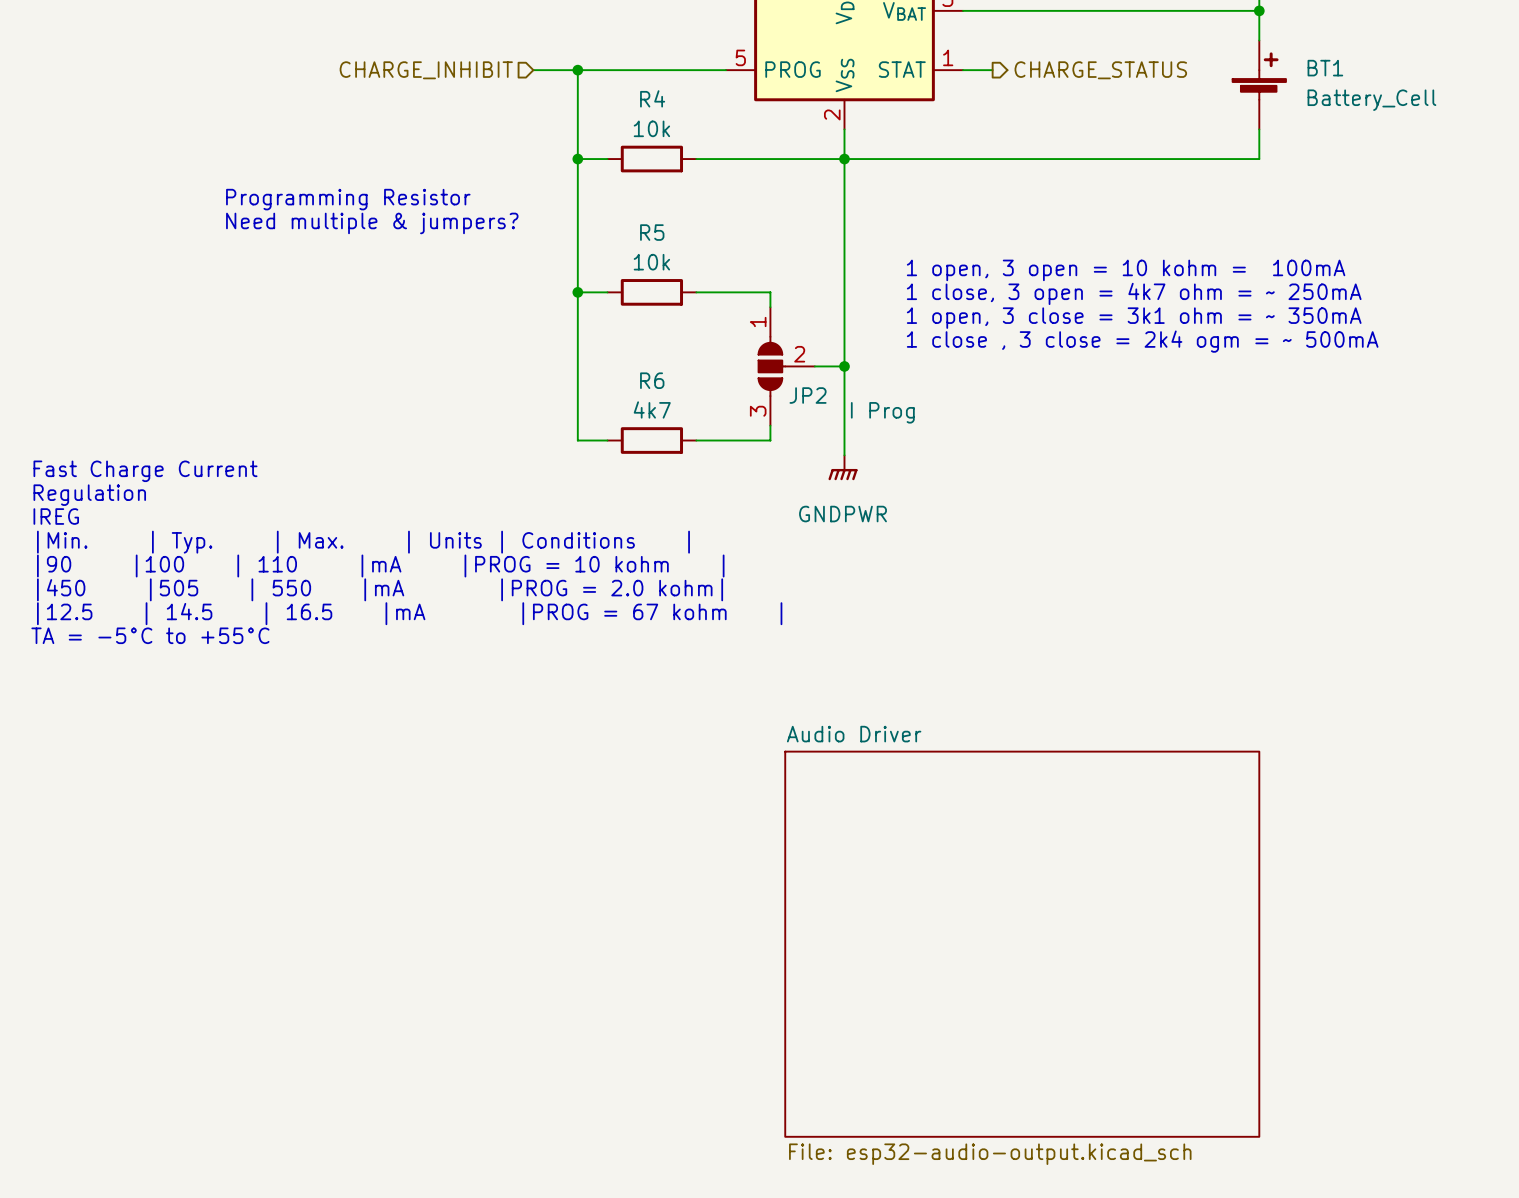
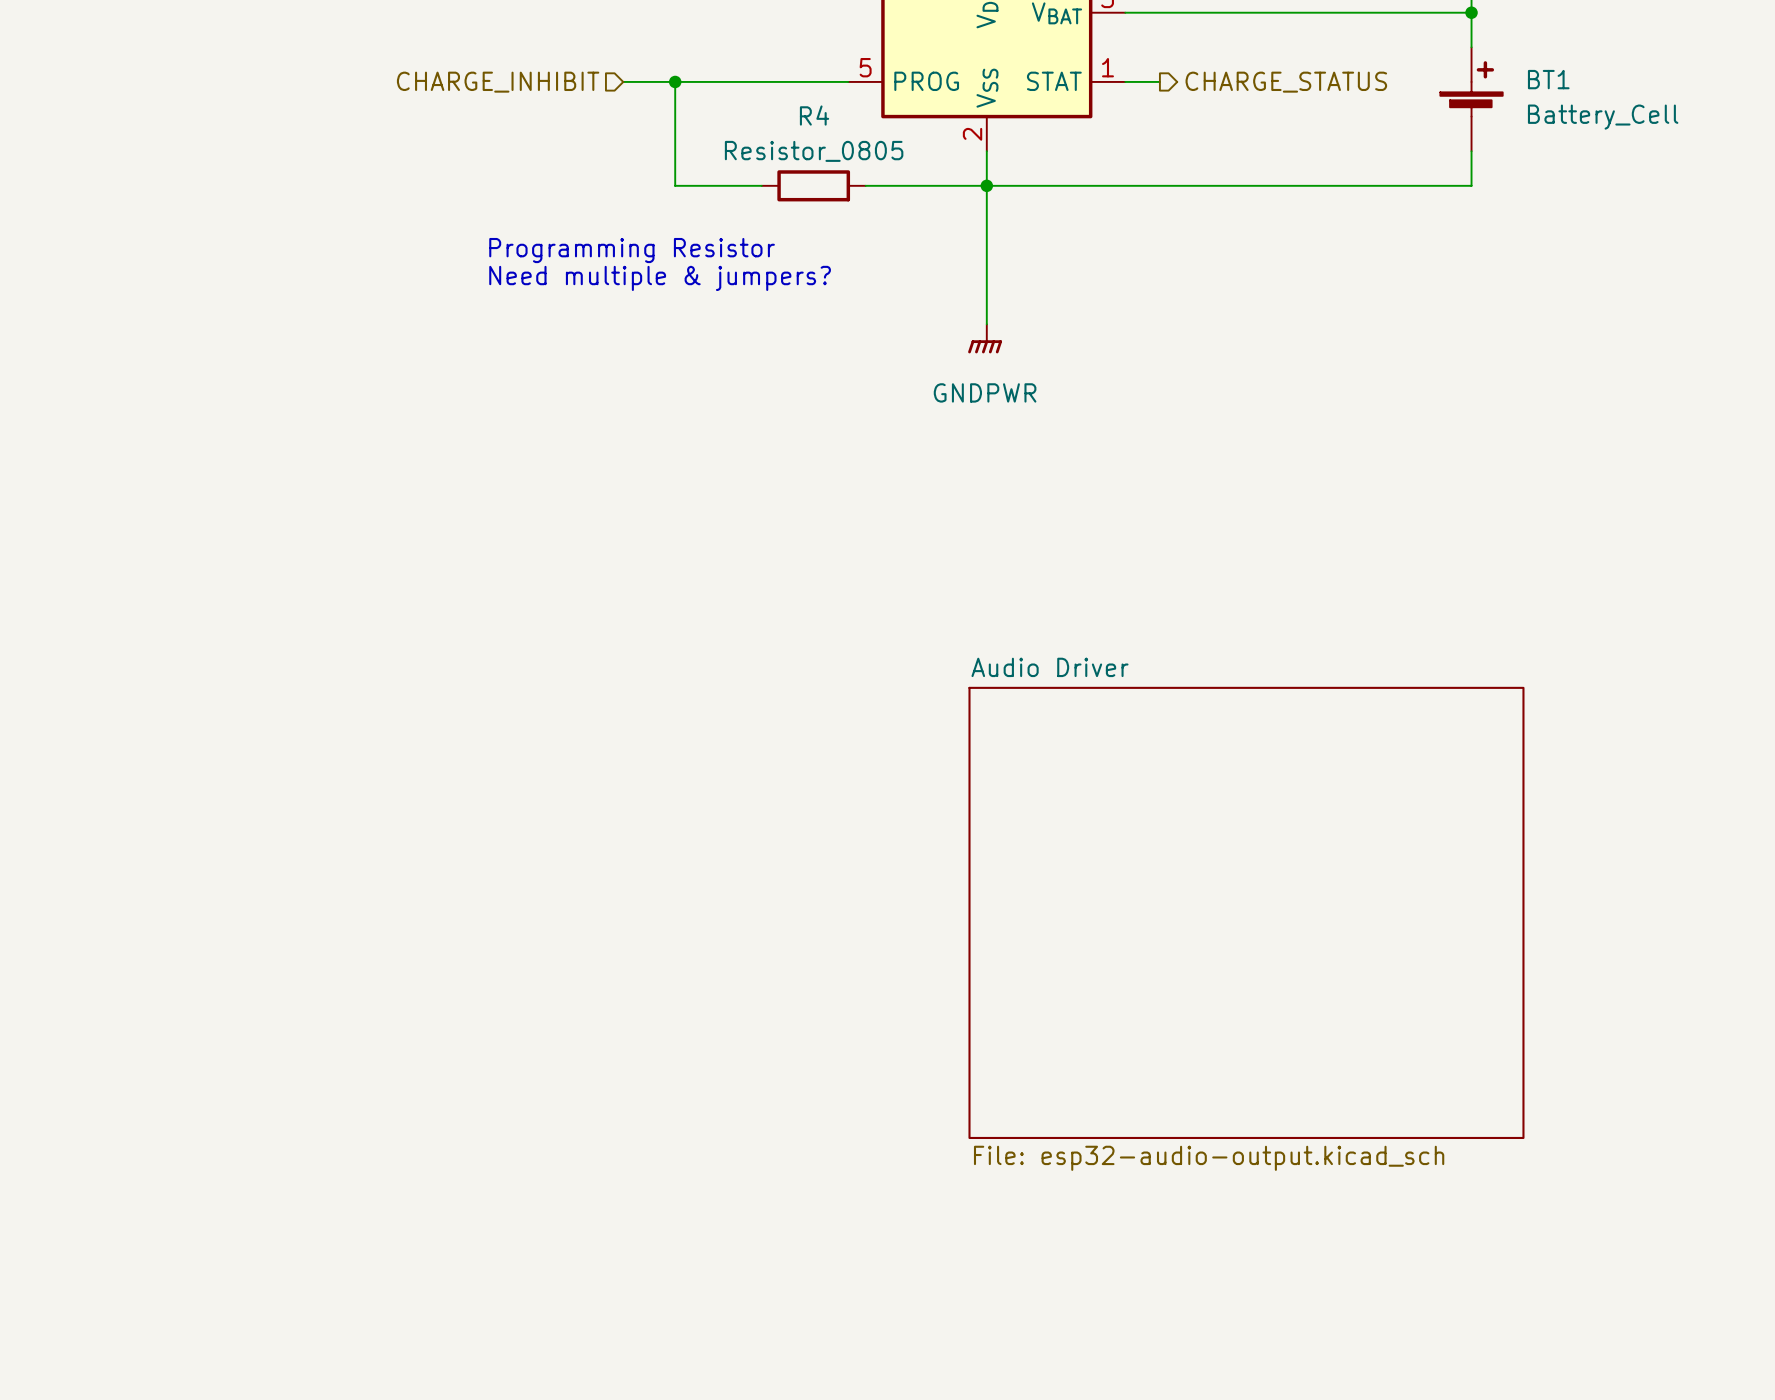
R4 value: 10k (651, 128) -> Resistor_0805 (814, 151)
wire: (577, 159) (577, 440) (607, 440) -> none
junction: (577, 159) -> none
R4 position: (651, 159) -> (813, 185)
wire: (696, 159) (740, 159) -> (709, 185) (761, 185)
text position: Programming Resistor (348, 199) -> Programming Resistor (632, 250)
text position: Need multiple & jumpers? (372, 223) -> Need multiple & jumpers? (660, 278)
text: 1 open, 3 open = 10 kohm = 100mA (1126, 270) -> none
wire: (844, 277) (844, 455) -> none
wire: (577, 292) (607, 292) -> none
junction: (577, 292) -> none
R5: 10k (651, 292) -> none
wire: (696, 292) (770, 292) (770, 307) -> none
text: 1 close, 3 open = 4k7 ohm = ~ 250mA (1134, 293) -> none
text: 1 open, 3 close = 3k1 ohm = ~ 350mA (1134, 318) -> none
text: 1 close , 3 close = 2k4 ogm = ~ 500mA (1142, 341) -> none
JP2: I Prog (786, 366) -> none
wire: (814, 366) (844, 366) -> none
junction: (844, 366) -> none
wire: (770, 425) (770, 440) (696, 440) -> none
R6: 4k7 (651, 440) -> none
power symbol position: GNDPWR (843, 467) -> GNDPWR (985, 338)
text: Fast Charge Current (145, 471) -> none
text: Regulation (89, 495) -> none
text: IREG (56, 516) -> none
text: |Min. | Typ. | Max. | Units | Conditions | (363, 542) -> none
text: |90 |100 | 110 |mA |PROG = 10 kohm | (380, 565) -> none
text: |450 |505 | 550 |mA |PROG = 2.0 kohm| (380, 589) -> none
text: |12.5 | 14.5 | 16.5 |mA |PROG = 67 kohm | (409, 613) -> none
text: TA = -5°C to +55°C (150, 635) -> none
sheet Audio Driver position: (1022, 944) -> (1246, 912)

